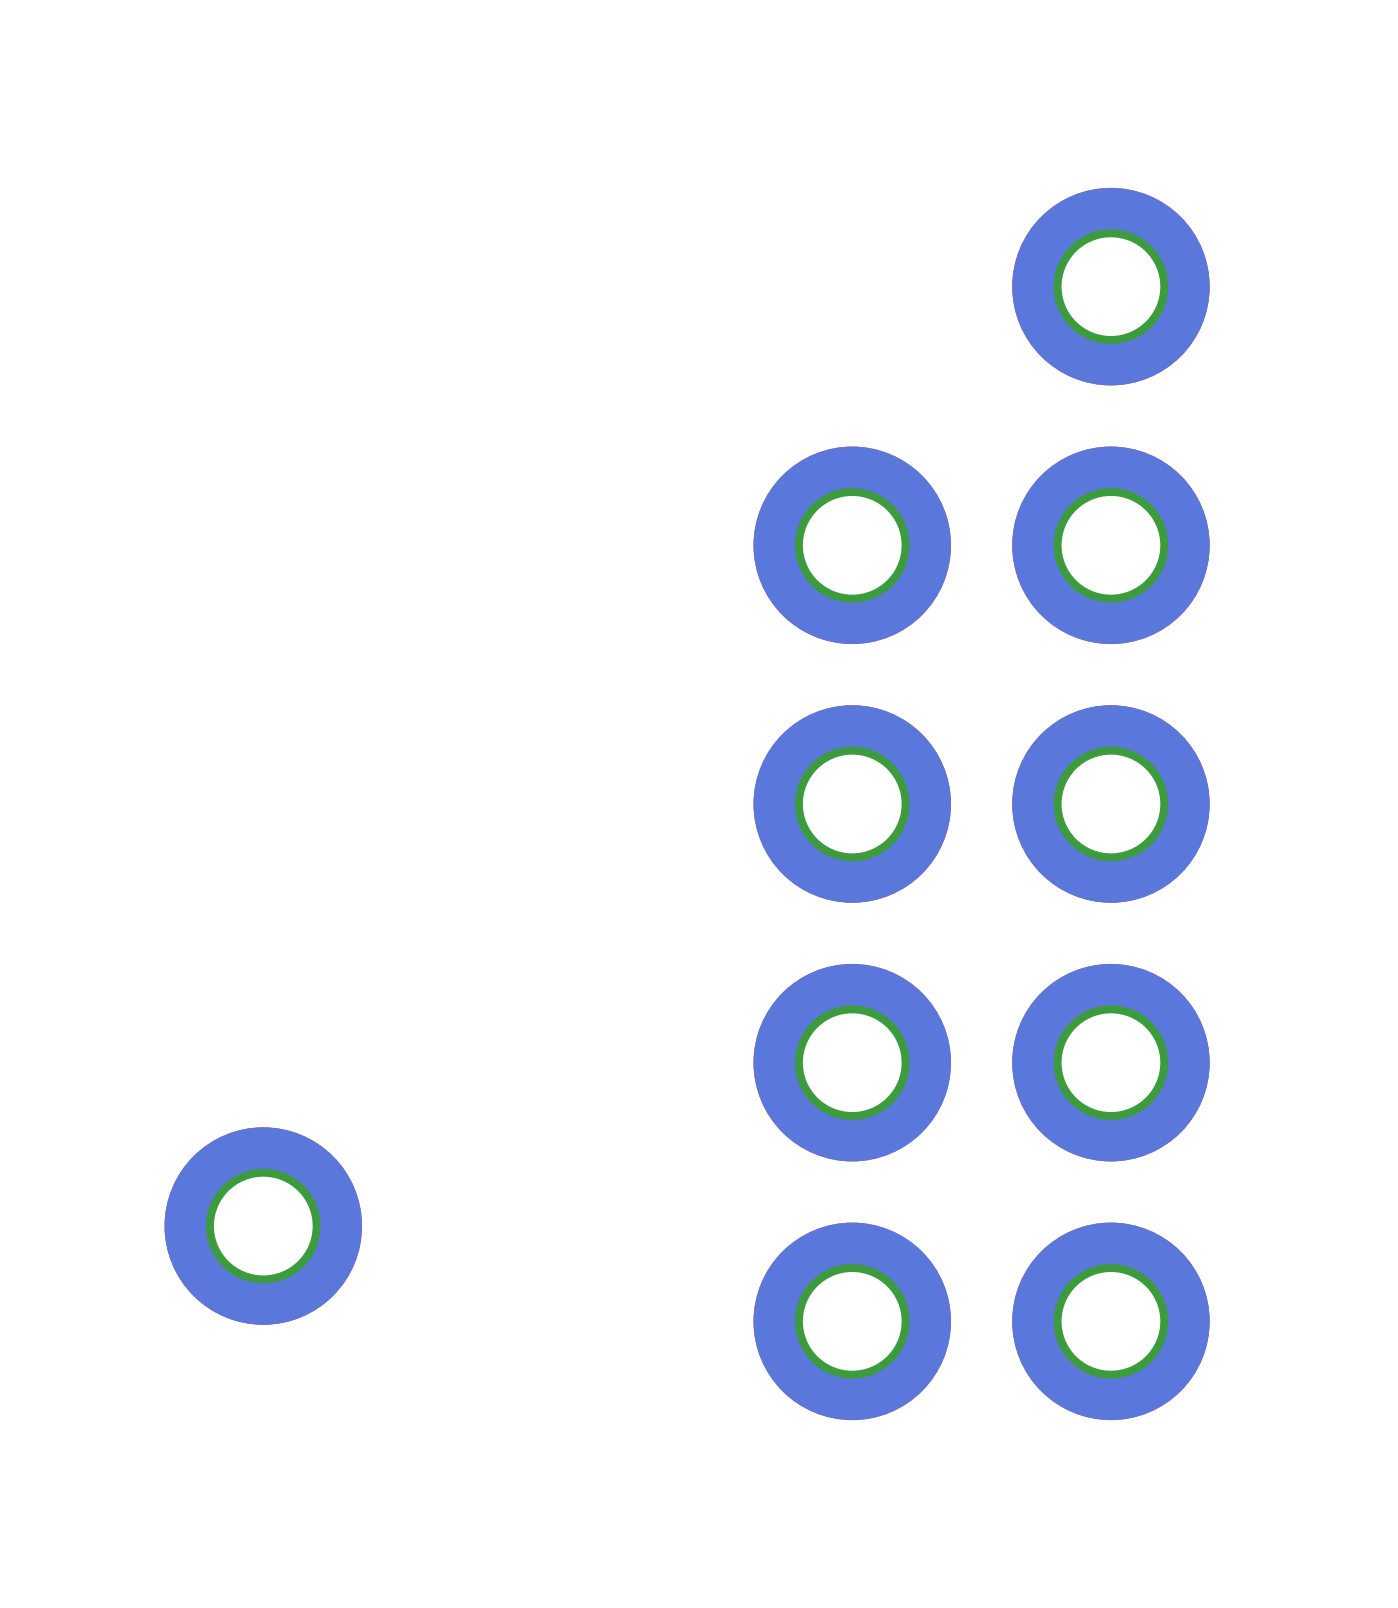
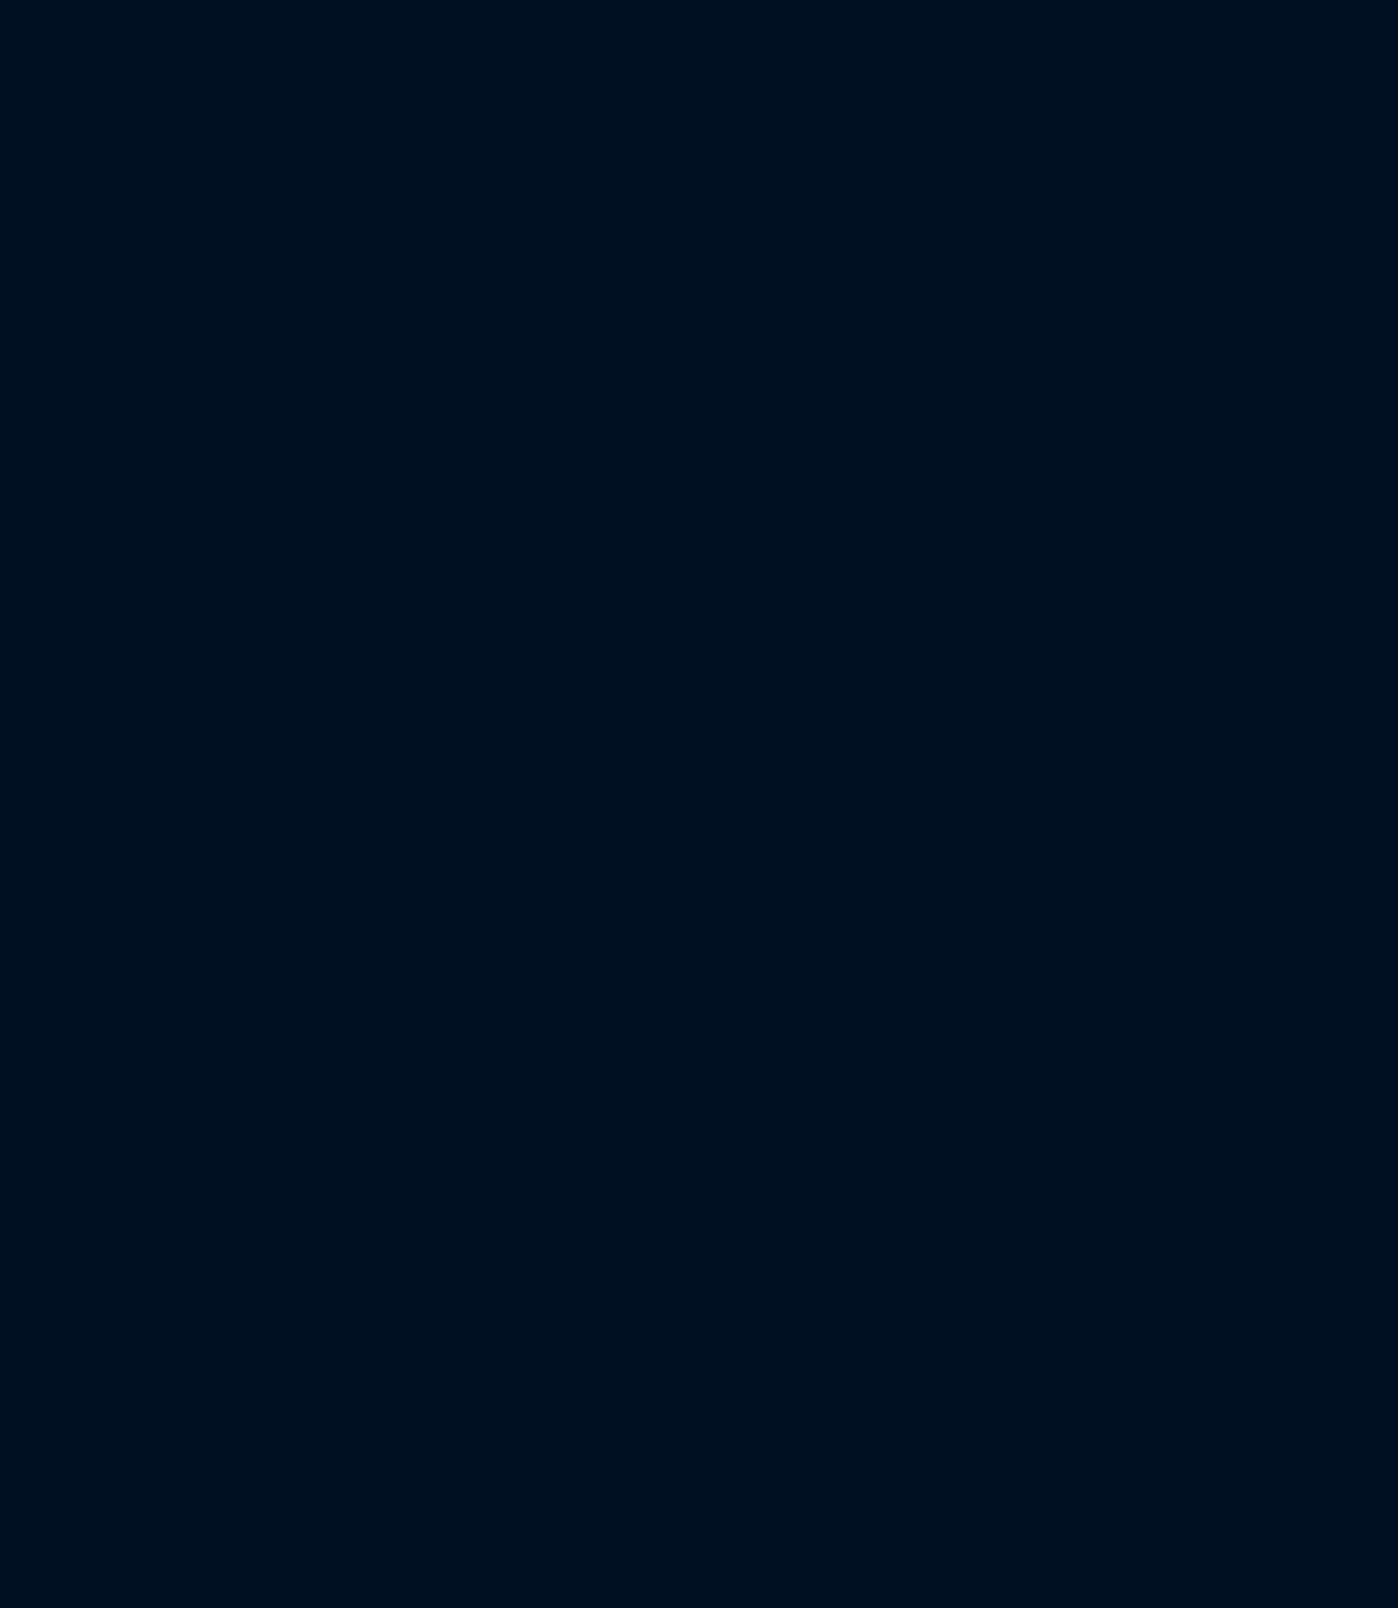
part: (1110, 286) -> none
part: (852, 545) -> none
part: (1110, 545) -> none
part: (852, 803) -> none
part: (1110, 803) -> none
part: (852, 1062) -> none
part: (1110, 1062) -> none
part: (263, 1226) -> none
part: (852, 1321) -> none
part: (1110, 1321) -> none

